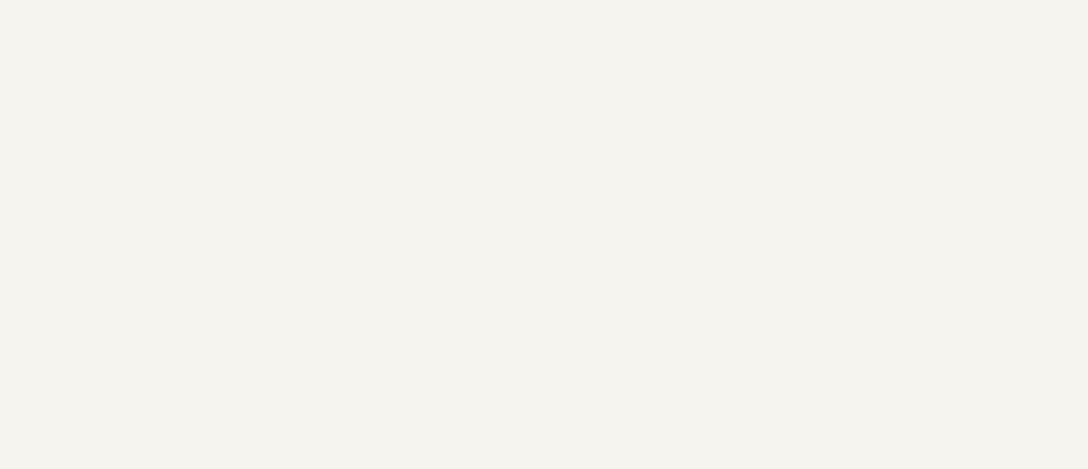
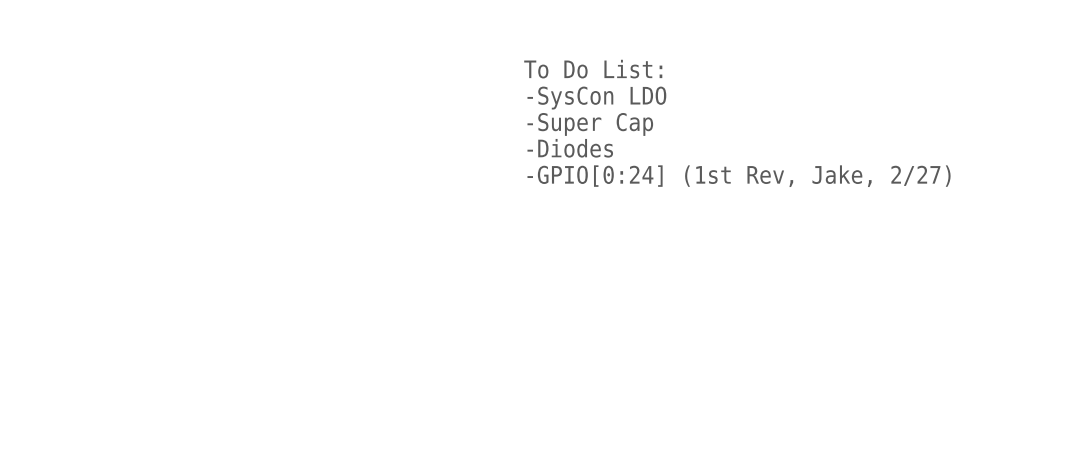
text: none -> To Do List: (593, 69)
text: none -> -SysCon LDO (596, 98)
text: none -> -Super Cap (590, 124)
text: none -> -Diodes (570, 148)
text: none -> -GPIO[0:24] (1st Rev, Jake, 2/27) (739, 176)

